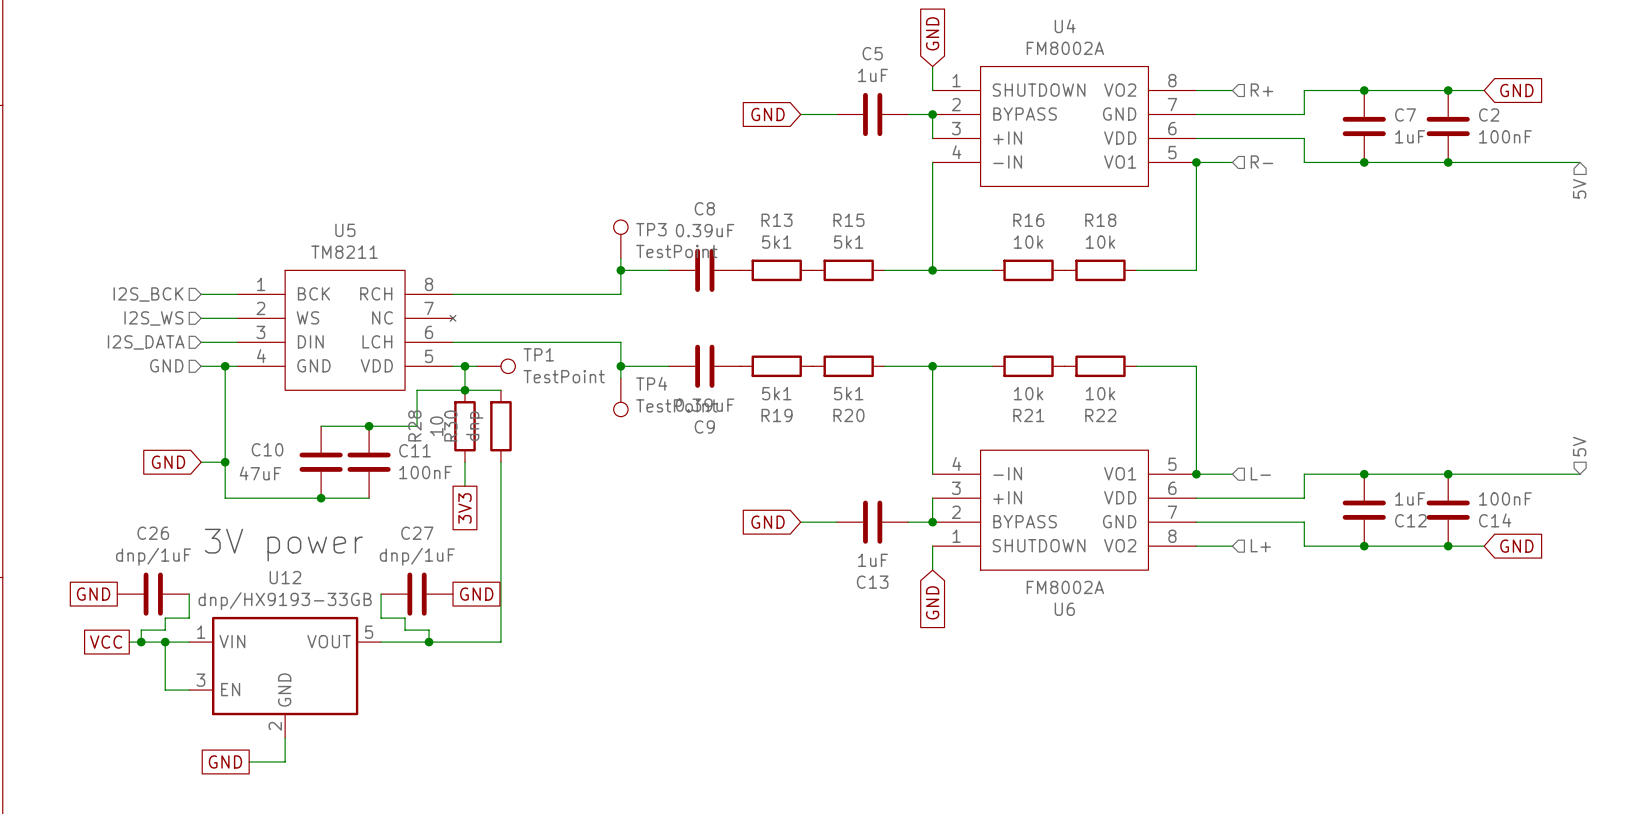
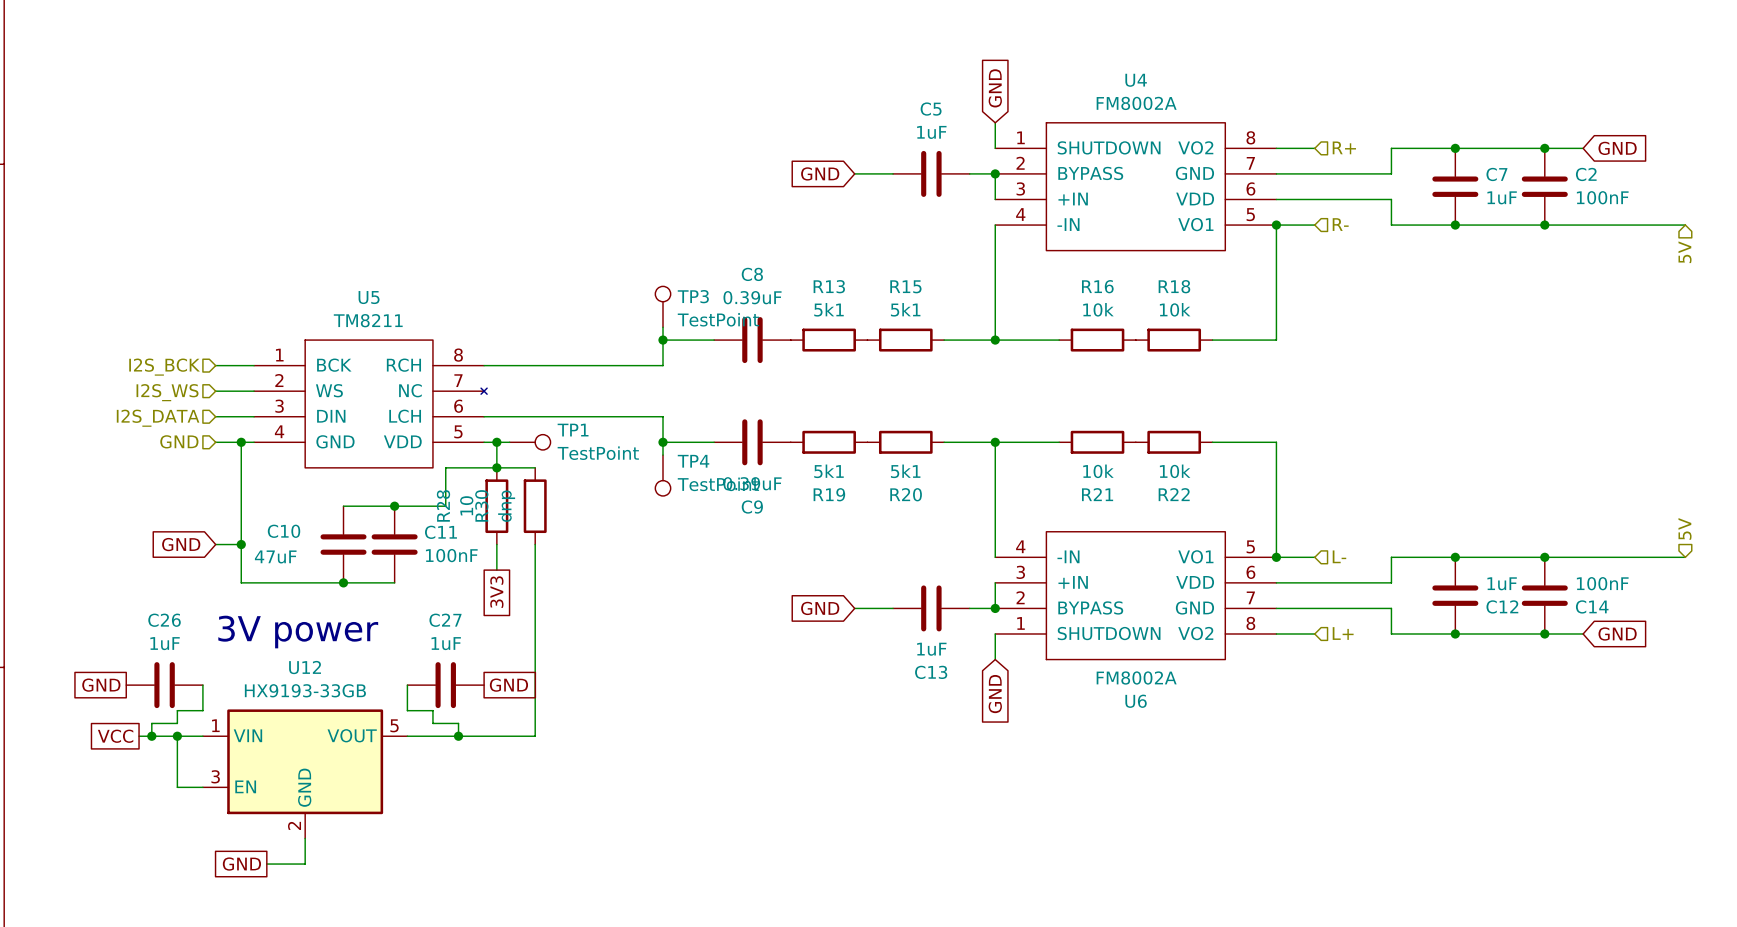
C26 value: dnp/1uF (153, 556) -> 1uF (165, 643)
C27 value: dnp/1uF (417, 556) -> 1uF (446, 643)
U12 value: dnp/HX9193-33GB (285, 601) -> HX9193-33GB (305, 690)

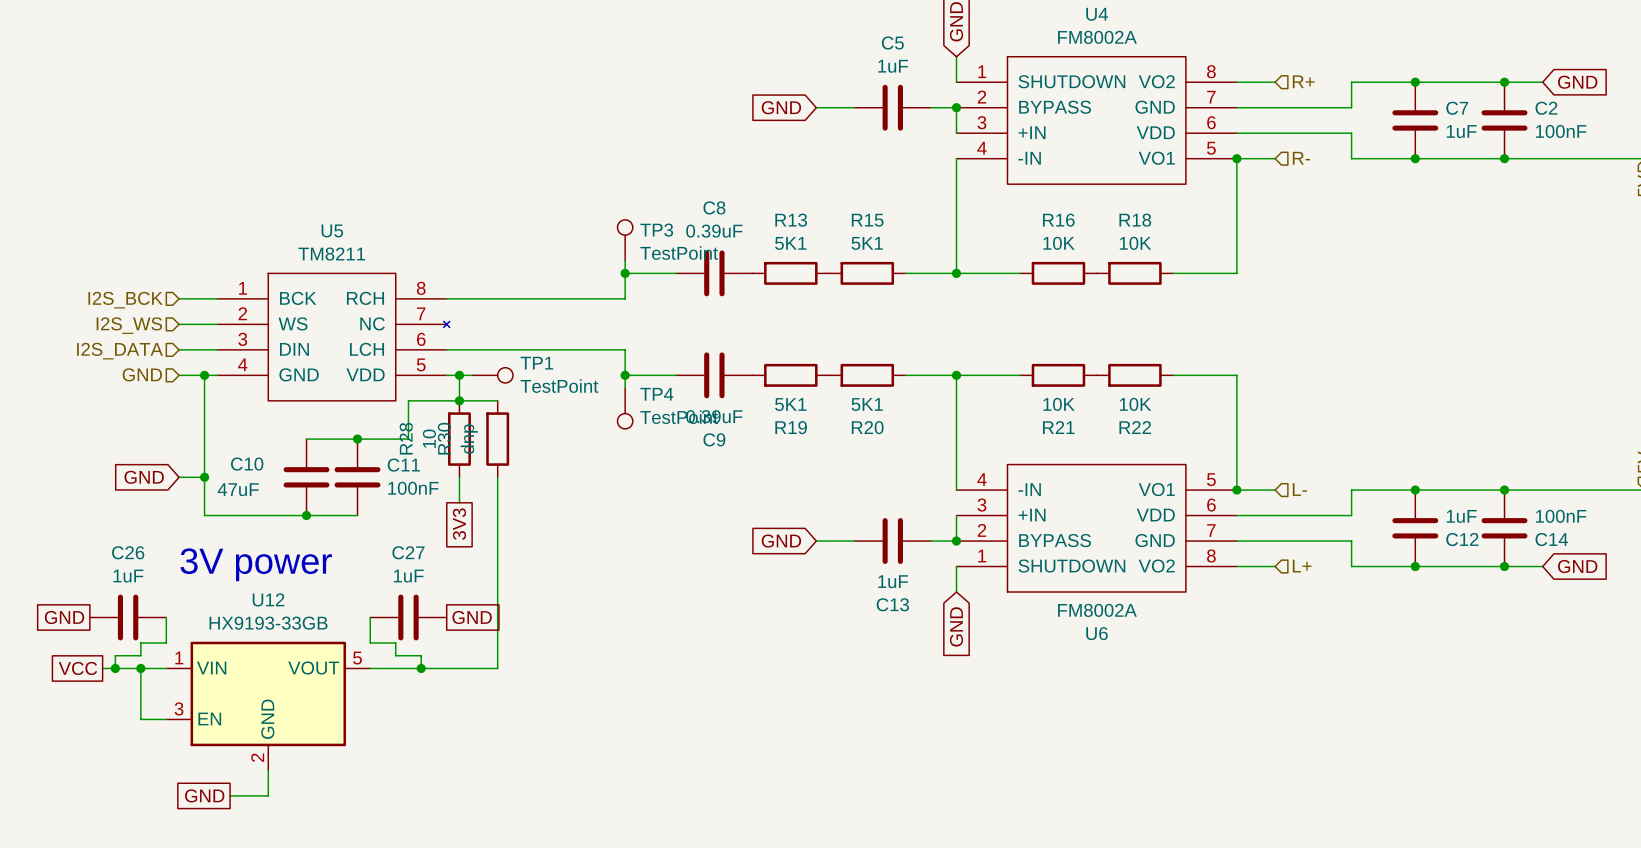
R13 value: 5k1 (829, 309) -> 5K1 (790, 243)
R15 value: 5k1 (905, 309) -> 5K1 (867, 243)
R16 value: 10k (1098, 309) -> 10K (1059, 243)
R18 value: 10k (1175, 309) -> 10K (1135, 243)
R19 value: 5k1 (829, 471) -> 5K1 (790, 404)
R20 value: 5k1 (905, 471) -> 5K1 (867, 404)
R21 value: 10k (1098, 471) -> 10K (1059, 404)
R22 value: 10k (1175, 471) -> 10K (1135, 404)

